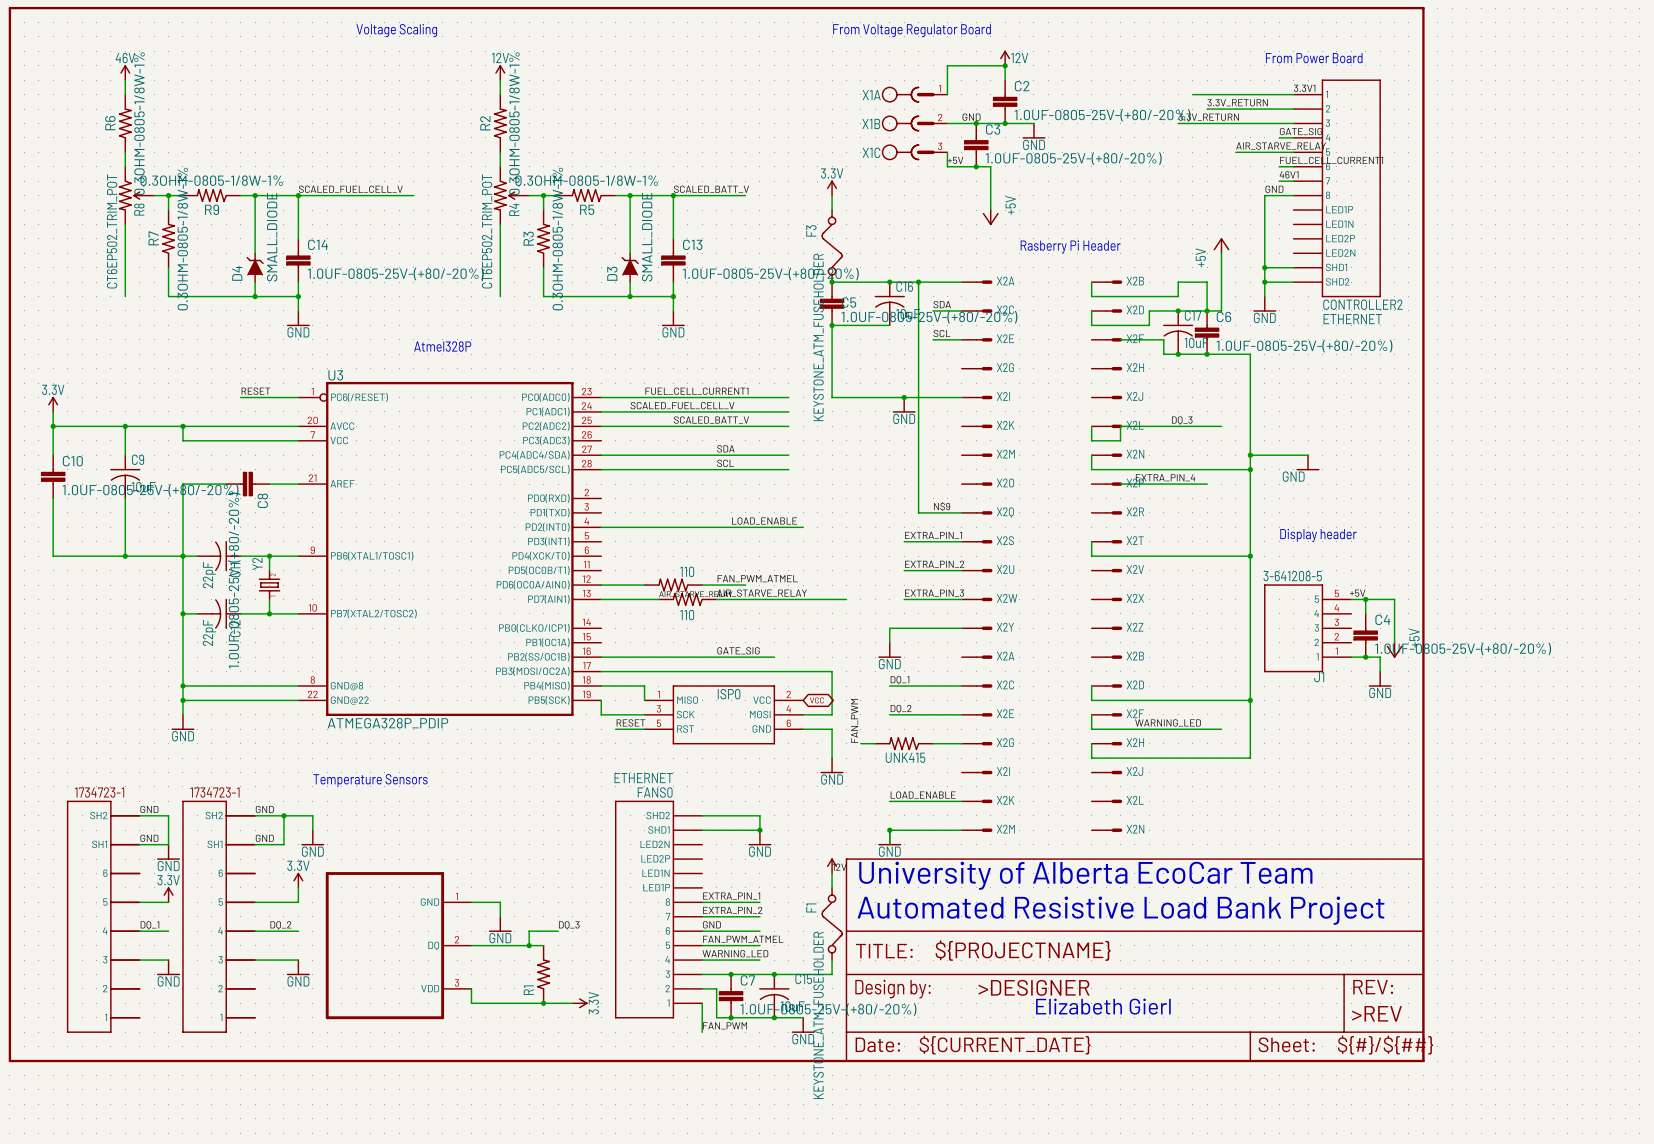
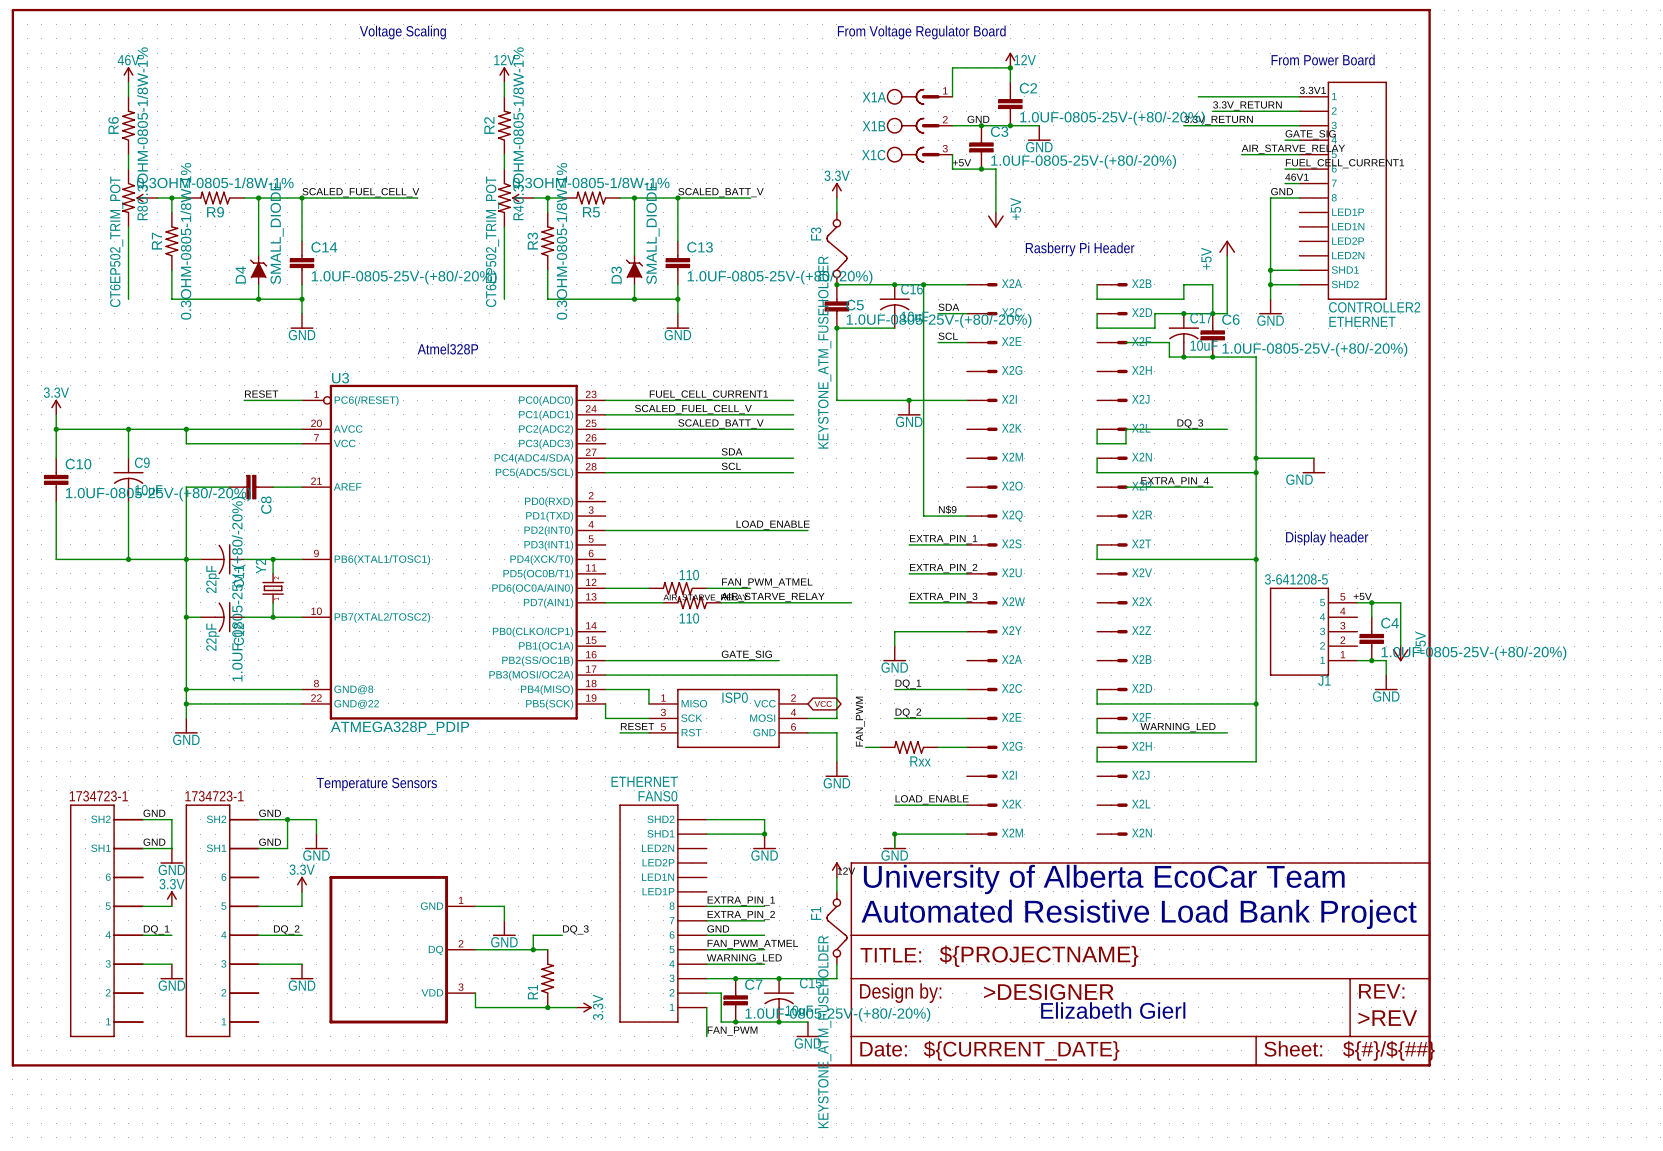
UNK415 name: UNK415 (905, 757) -> Rxx (920, 761)

